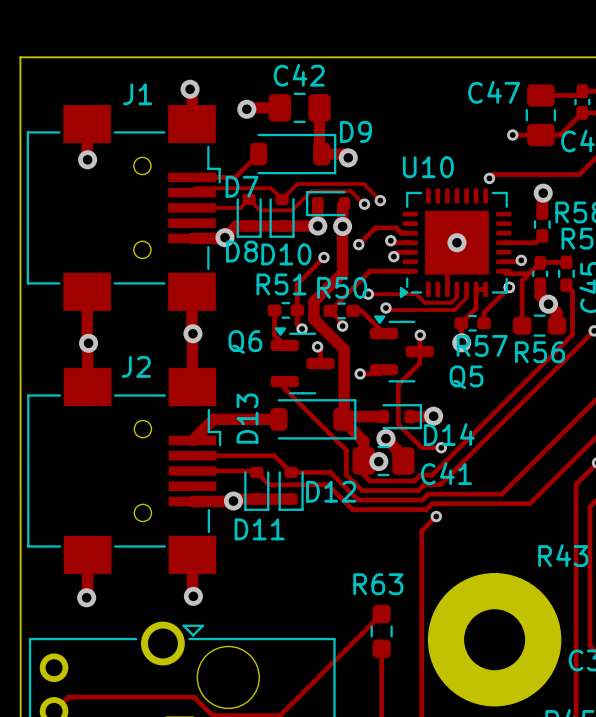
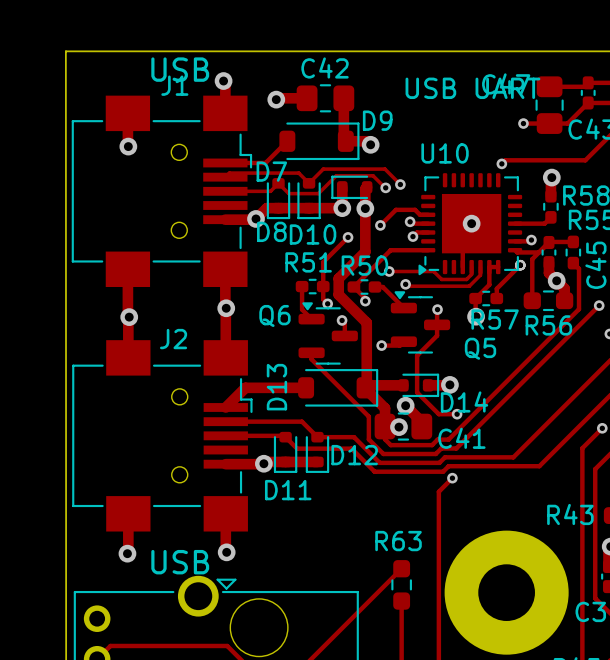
text: none -> USB (180, 69)
text: none -> USB UART (472, 88)
text: none -> USB (180, 562)

